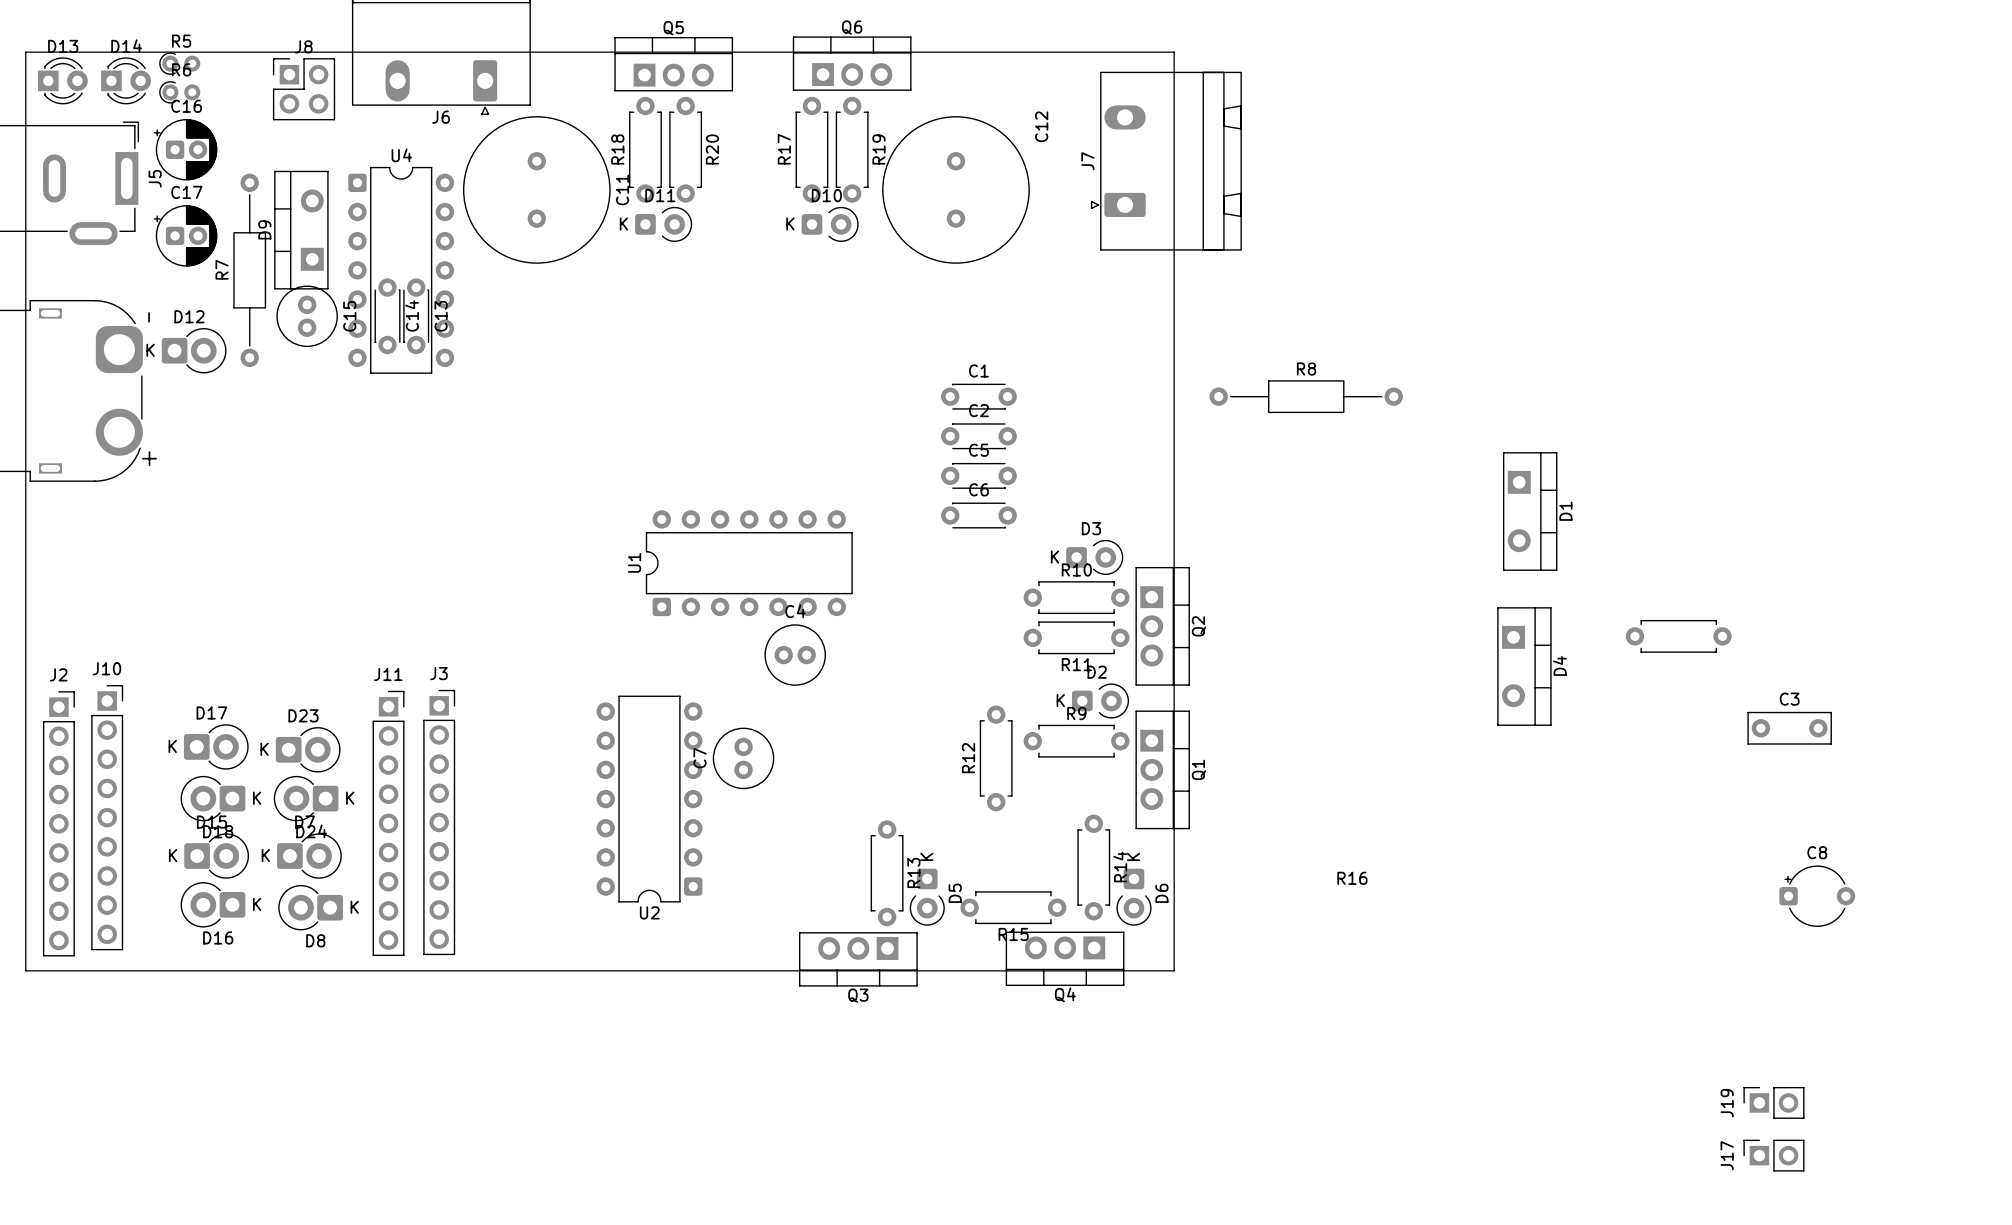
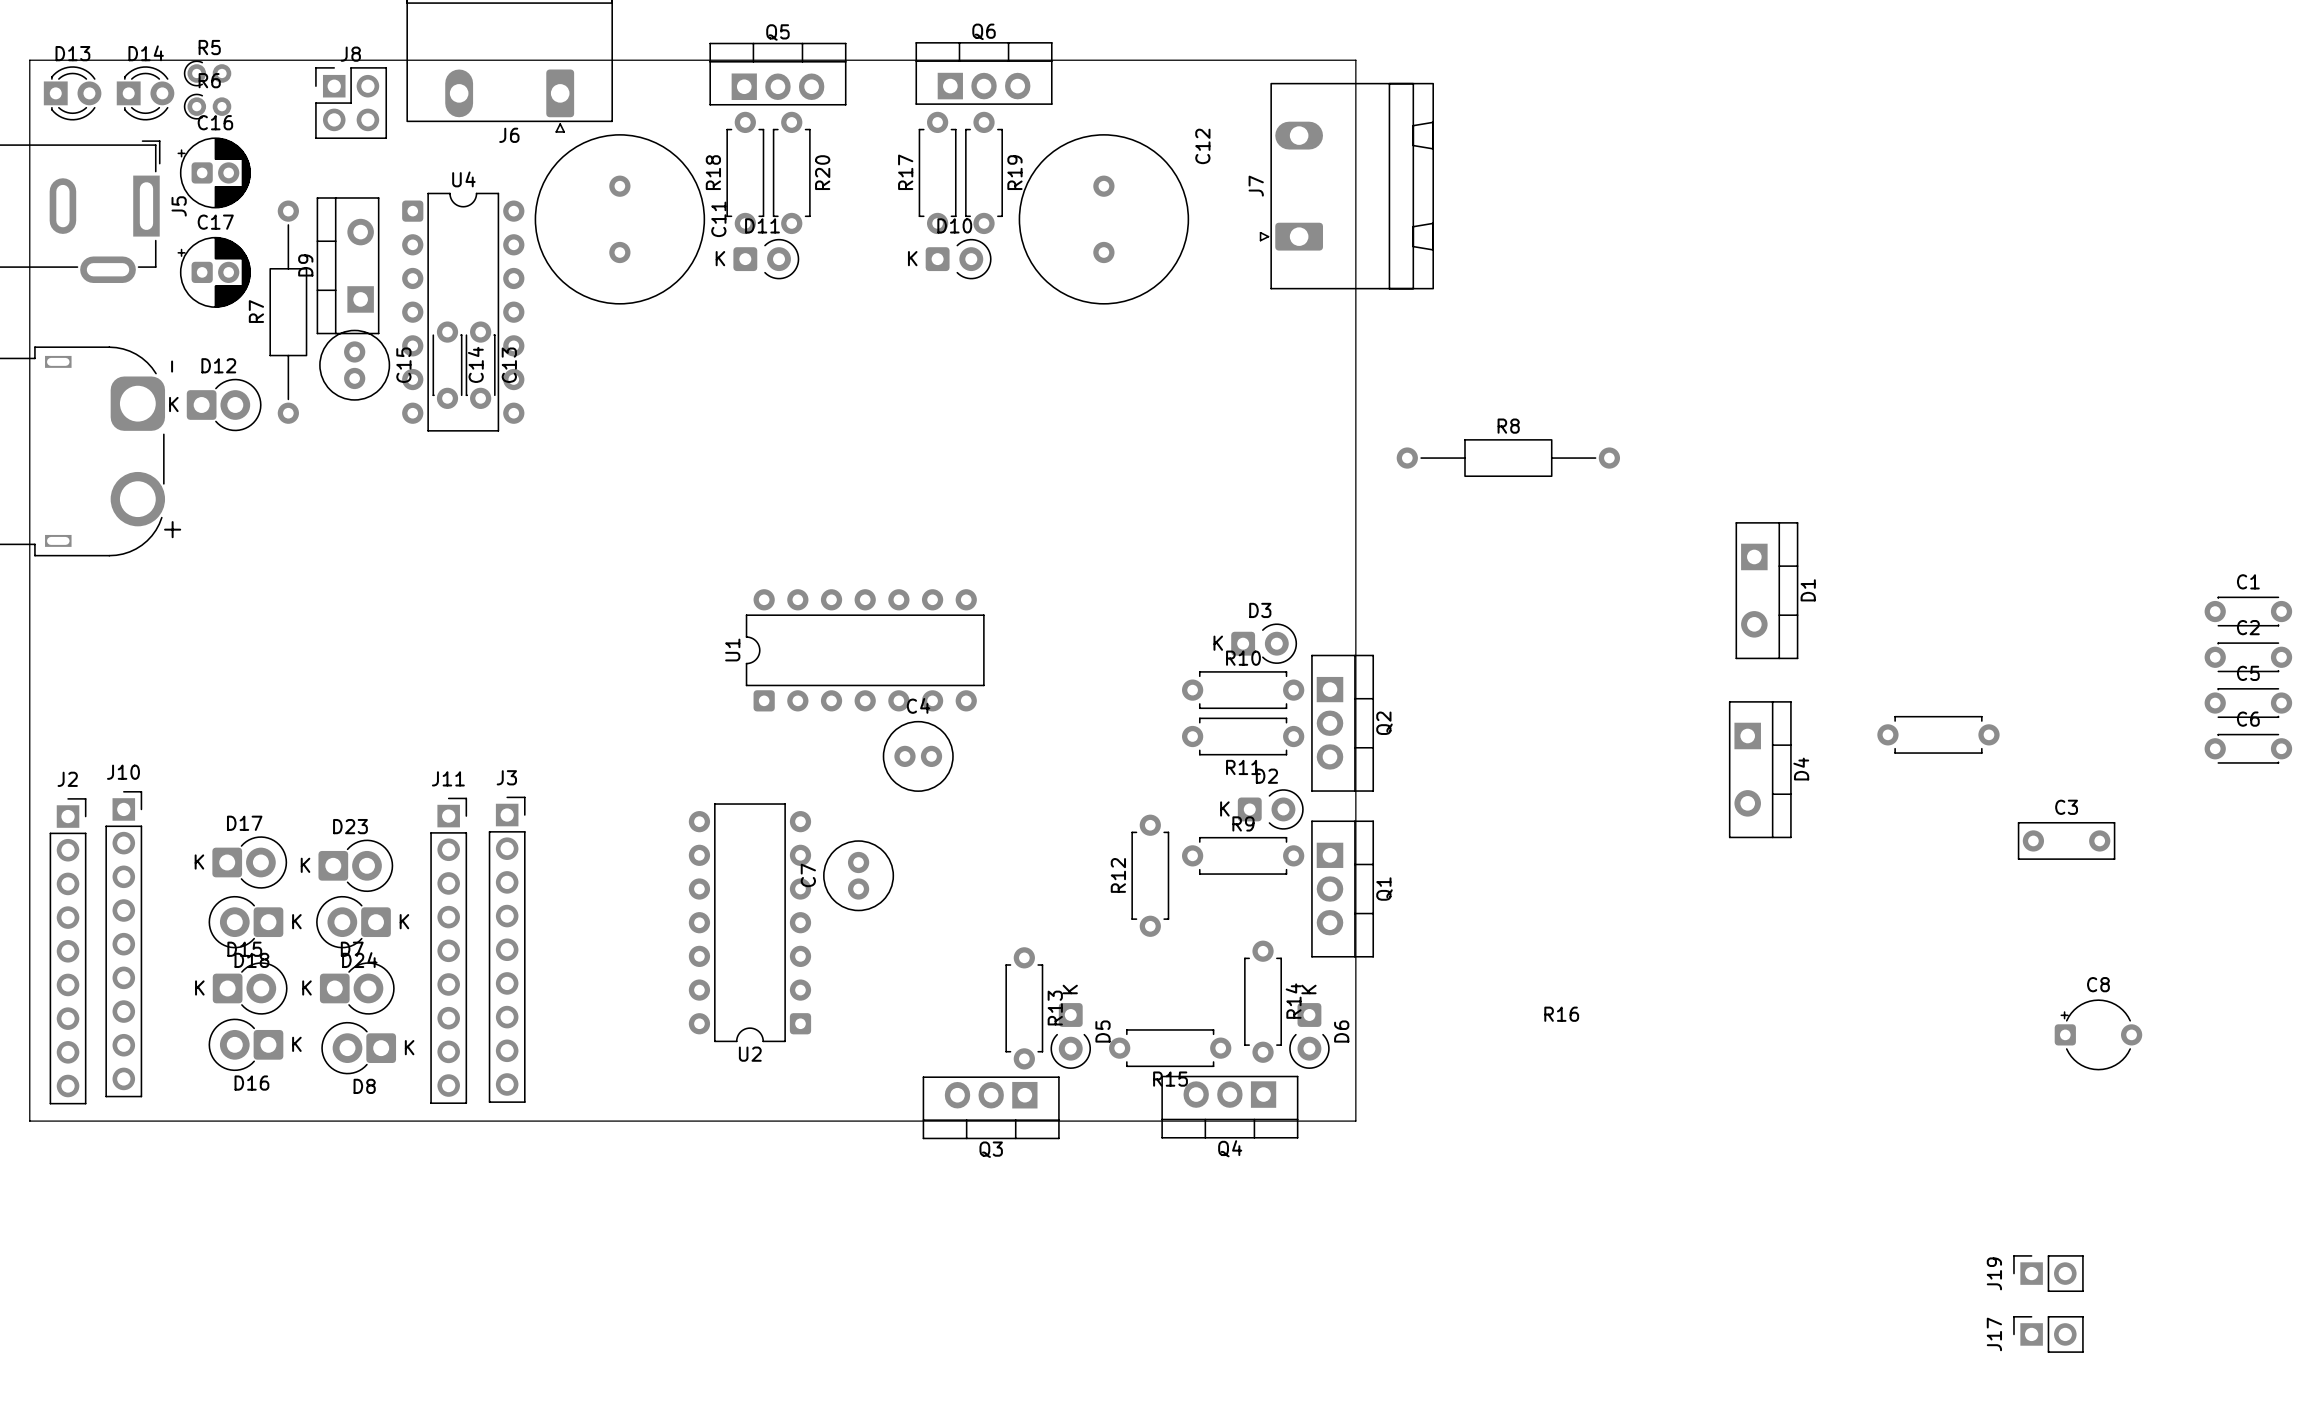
C1 position: (978, 396) -> (2248, 611)
C2 position: (978, 436) -> (2248, 657)
C5 position: (978, 475) -> (2248, 703)
C6 position: (978, 515) -> (2248, 748)

